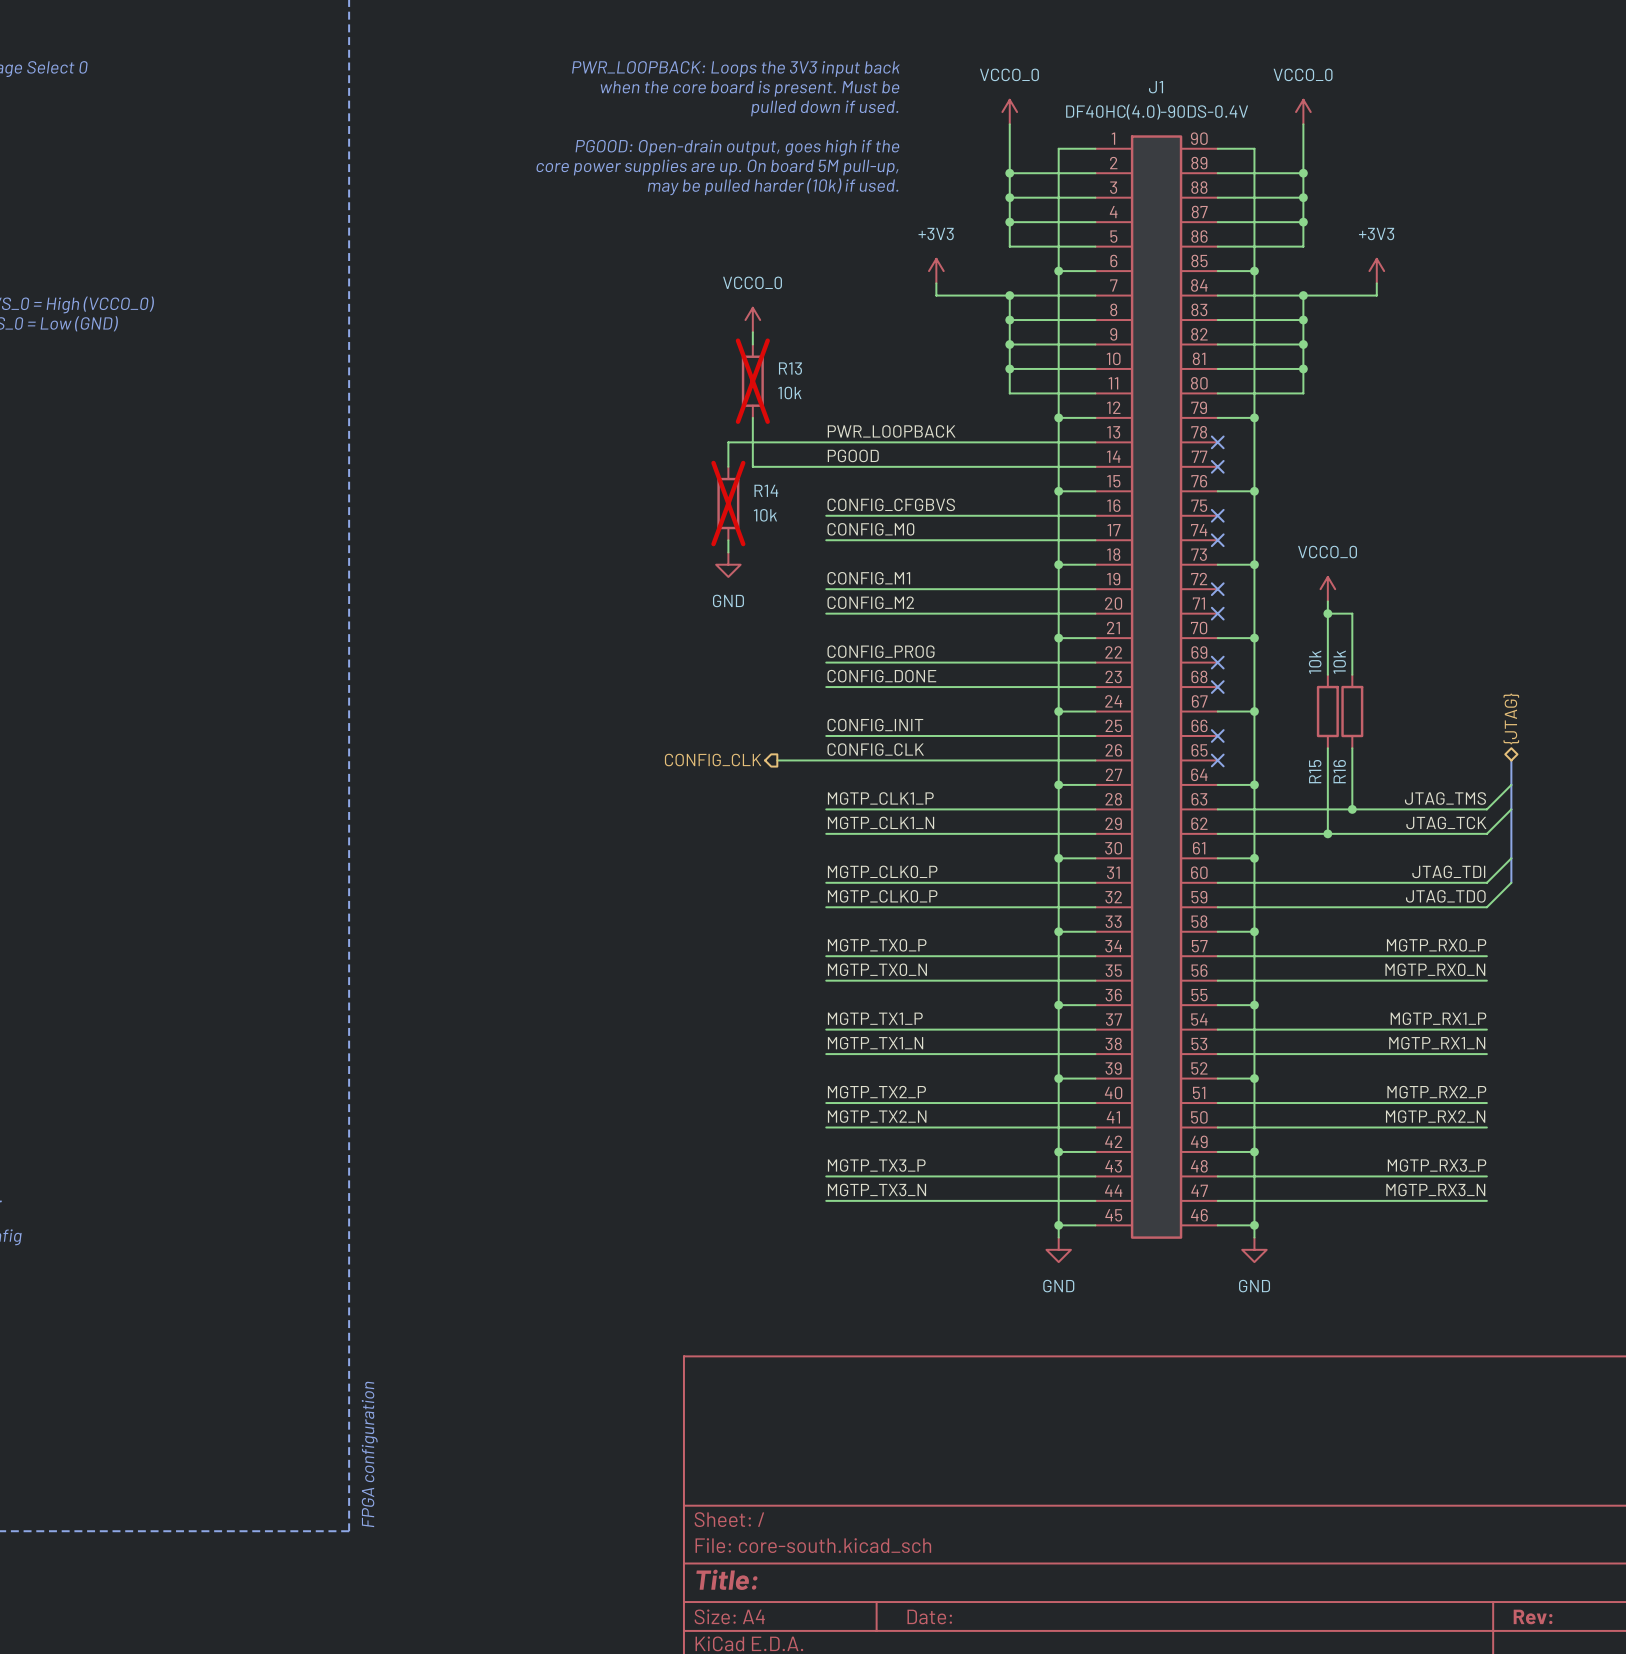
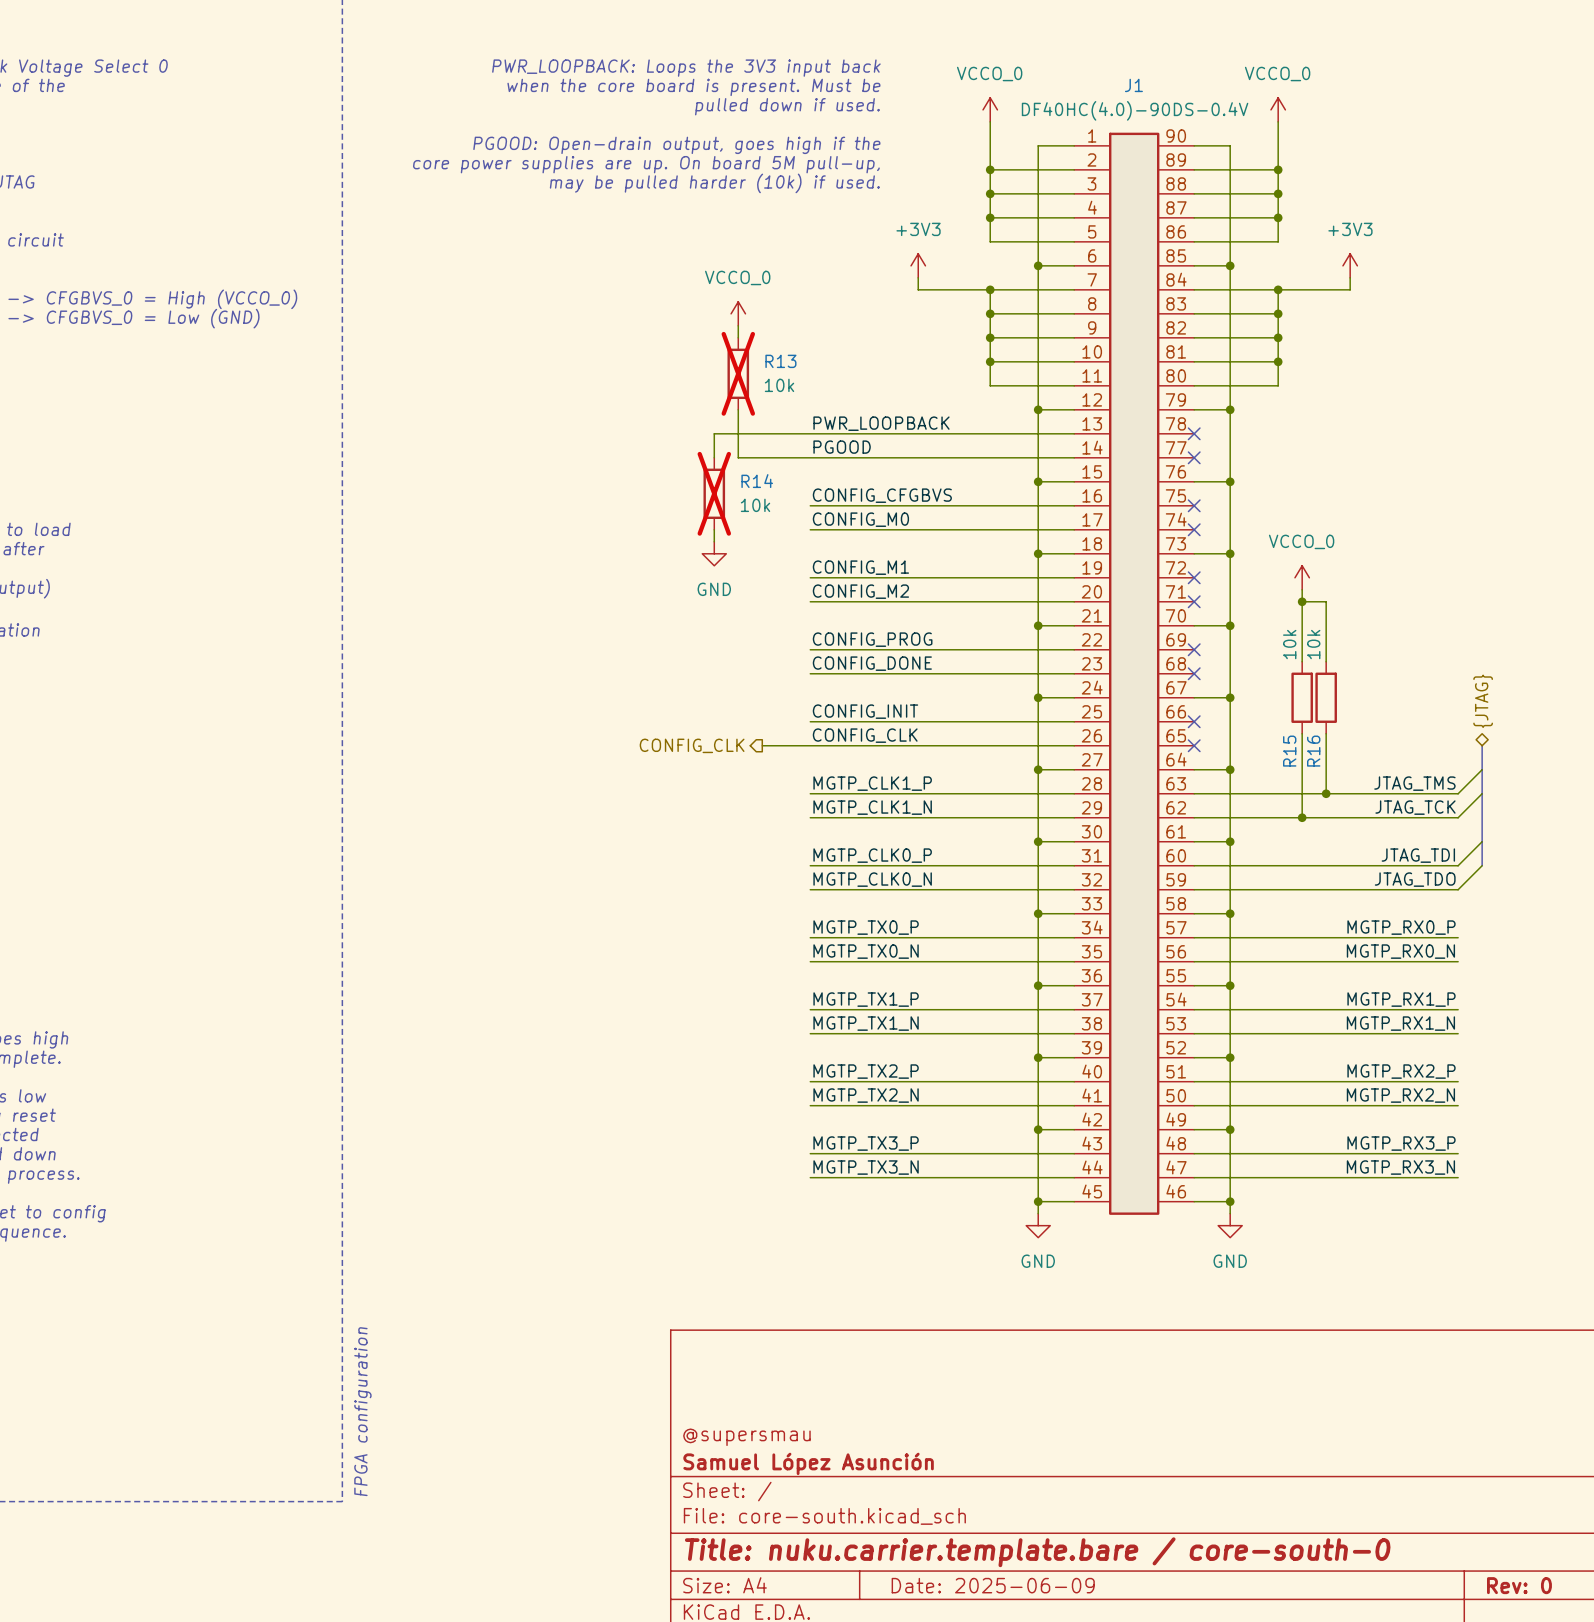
label: MGTP_CLK0_P (882, 896) -> MGTP_CLK0_N (872, 879)
title block: none -> @supersmau (746, 1437)
title block: none -> Samuel López Asunción (808, 1463)
title block: Title: (726, 1579) -> Title: nuku.carrier.template.bare / core-south-0 (1037, 1552)
title block: Date: (929, 1616) -> Date: 2025-06-09 (993, 1585)
title block: Rev: (1533, 1616) -> Rev: 0 (1519, 1585)

